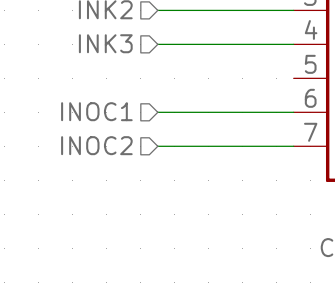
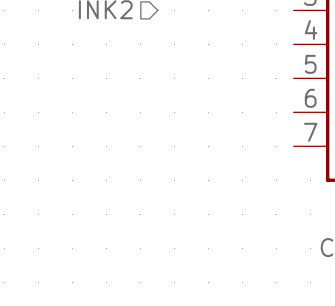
wire: (157, 10) (293, 10) -> none
hierarchical label: INK3 (105, 43) -> none
wire: (157, 44) (293, 44) -> none
hierarchical label: INOC1 (96, 111) -> none
wire: (157, 112) (293, 112) -> none
hierarchical label: INOC2 (96, 145) -> none
wire: (157, 146) (293, 146) -> none

